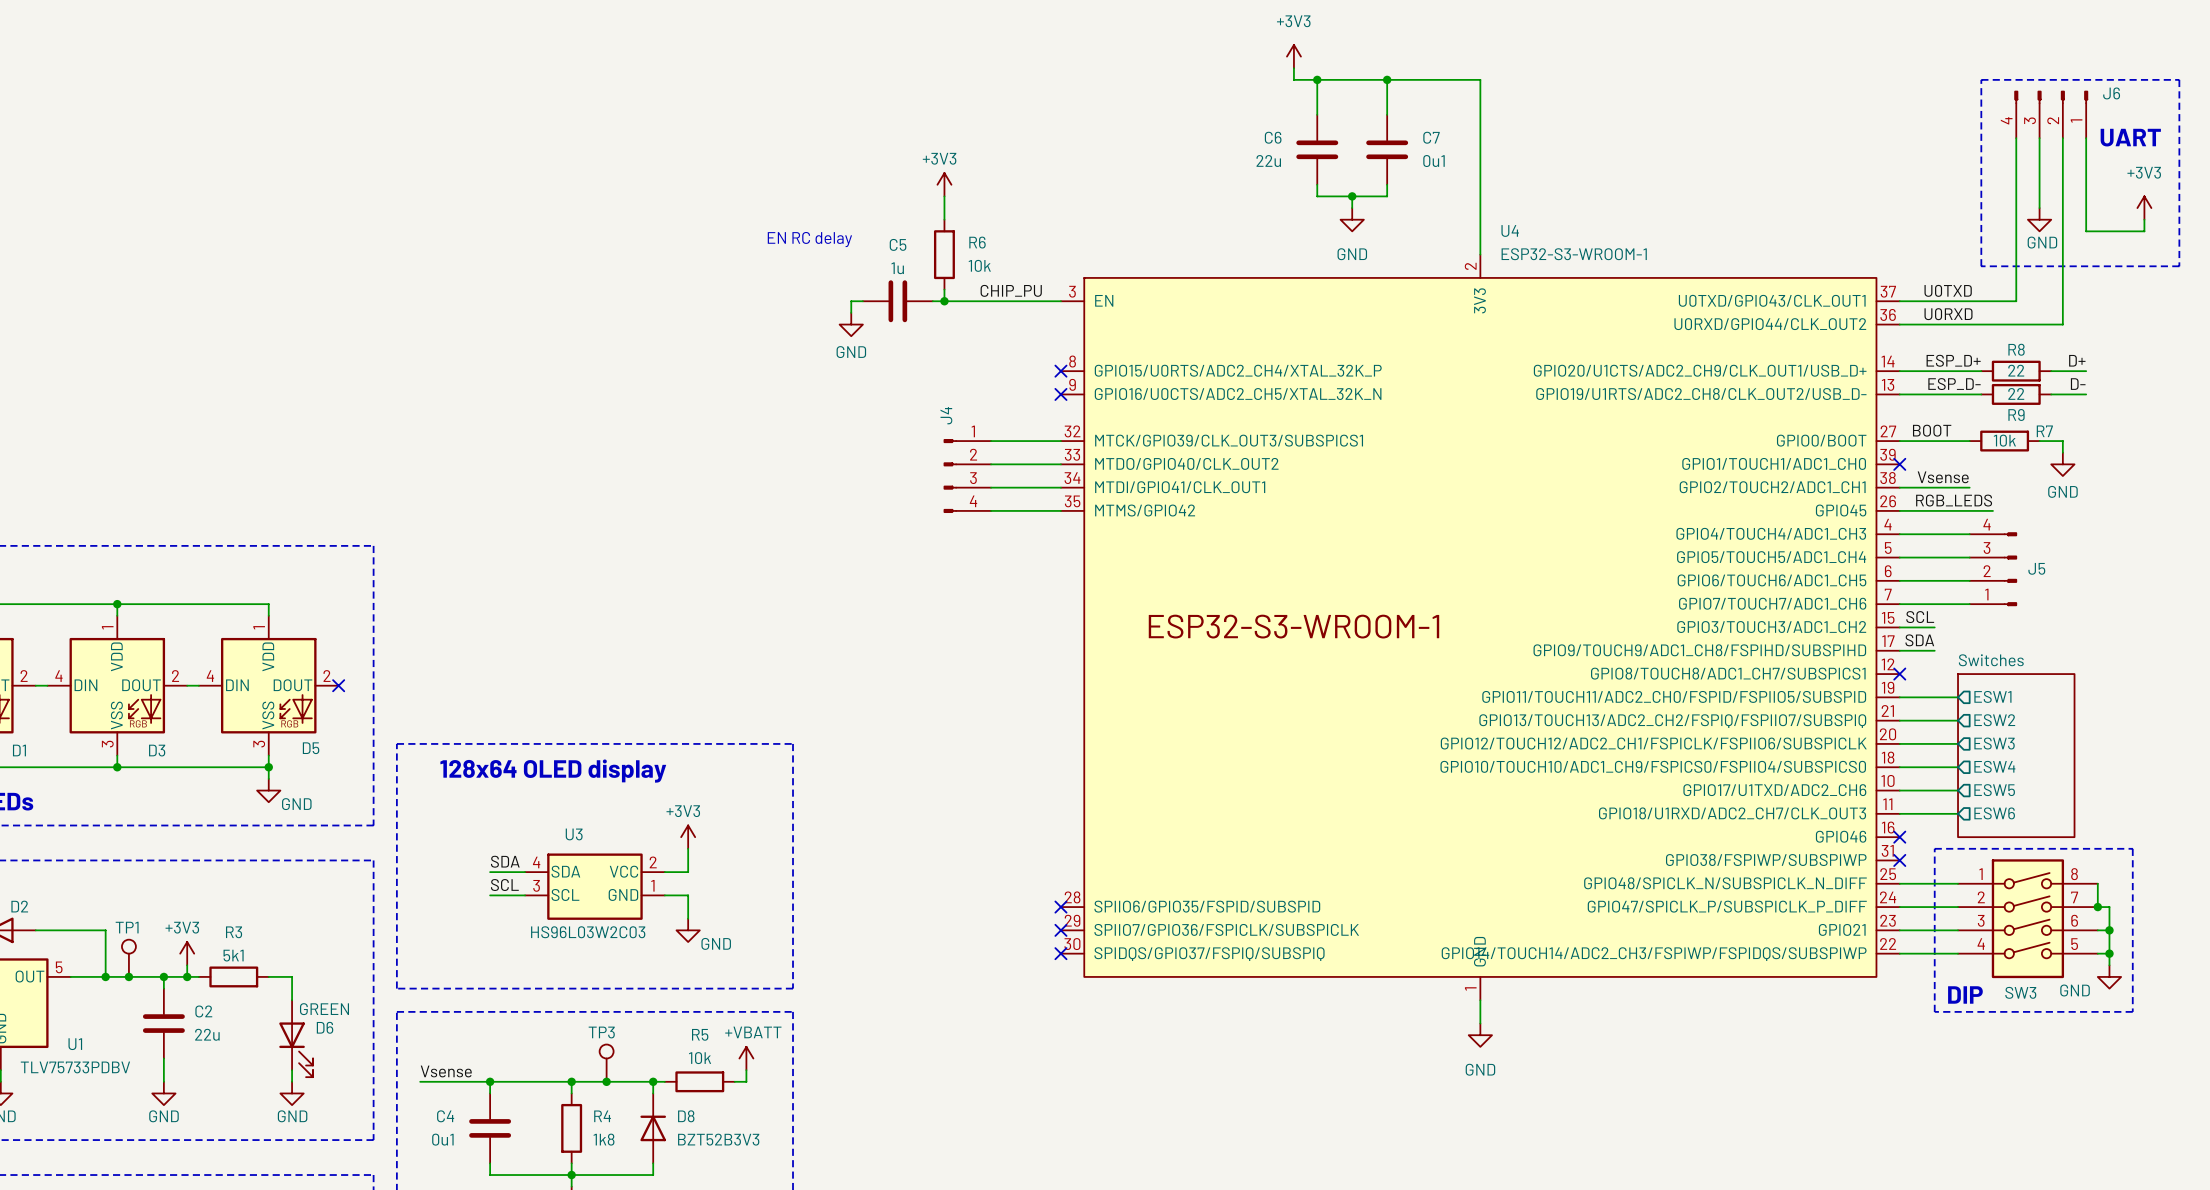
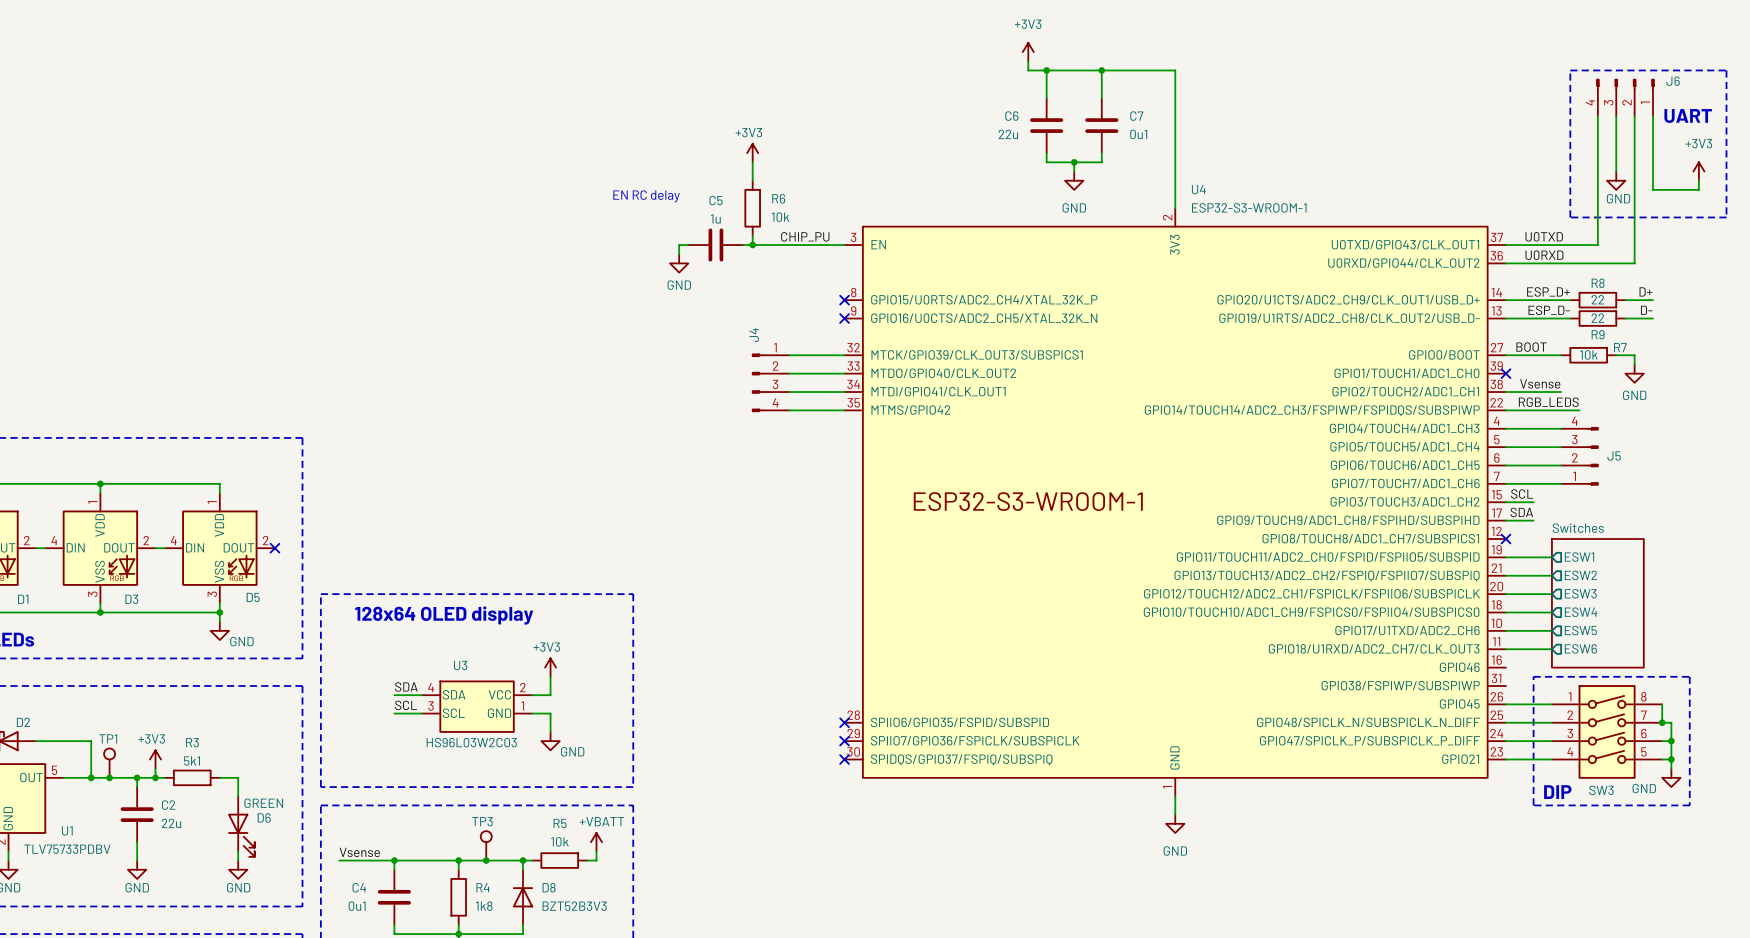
U4 symbol: [1060, 254, 1900, 1001] -> [844, 208, 1507, 797]
no-connect mark: (1899, 837) -> none
no-connect mark: (1899, 860) -> none

